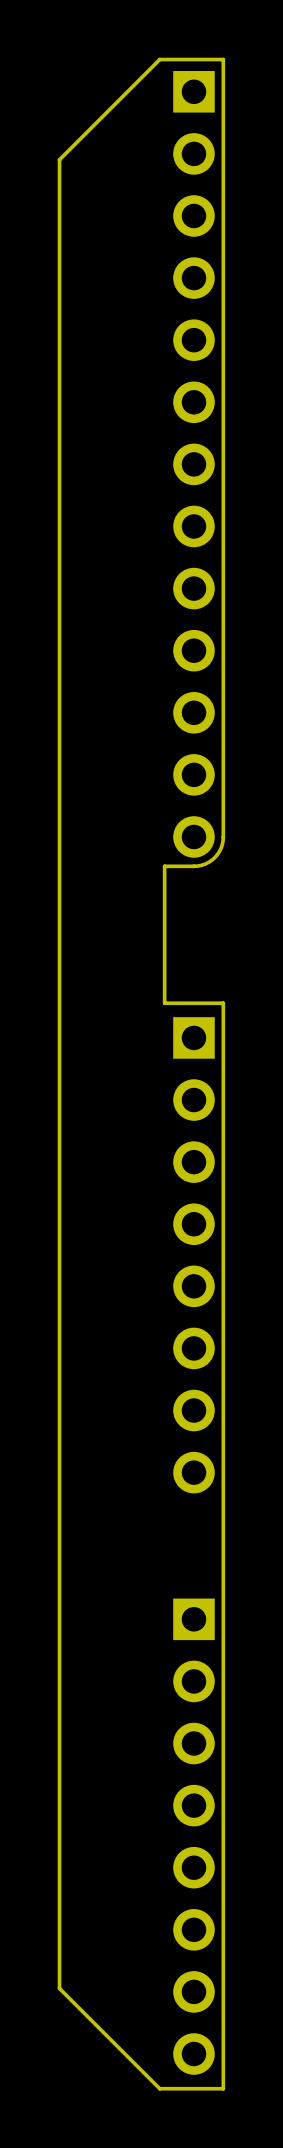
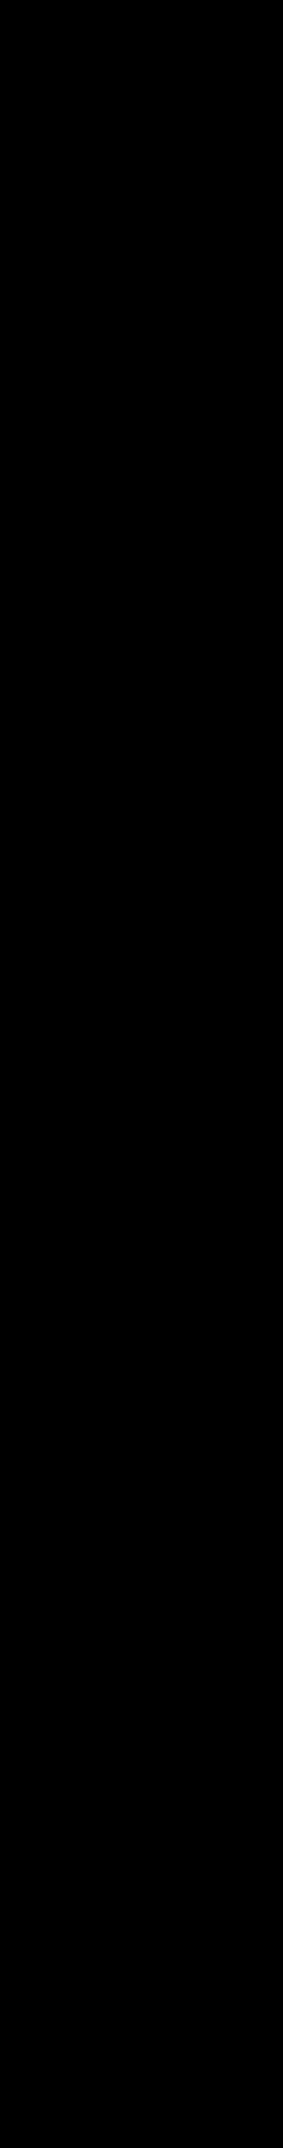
board edge: (223, 59) (223, 840) (217, 854) (205, 864) (193, 866) (164, 866) (164, 1003) (223, 1003) (223, 2088) (159, 2088) (59, 1988) (59, 159) (159, 59) (223, 59) -> none
part: (193, 464) -> none
part: (193, 1255) -> none
part: (193, 1836) -> none

